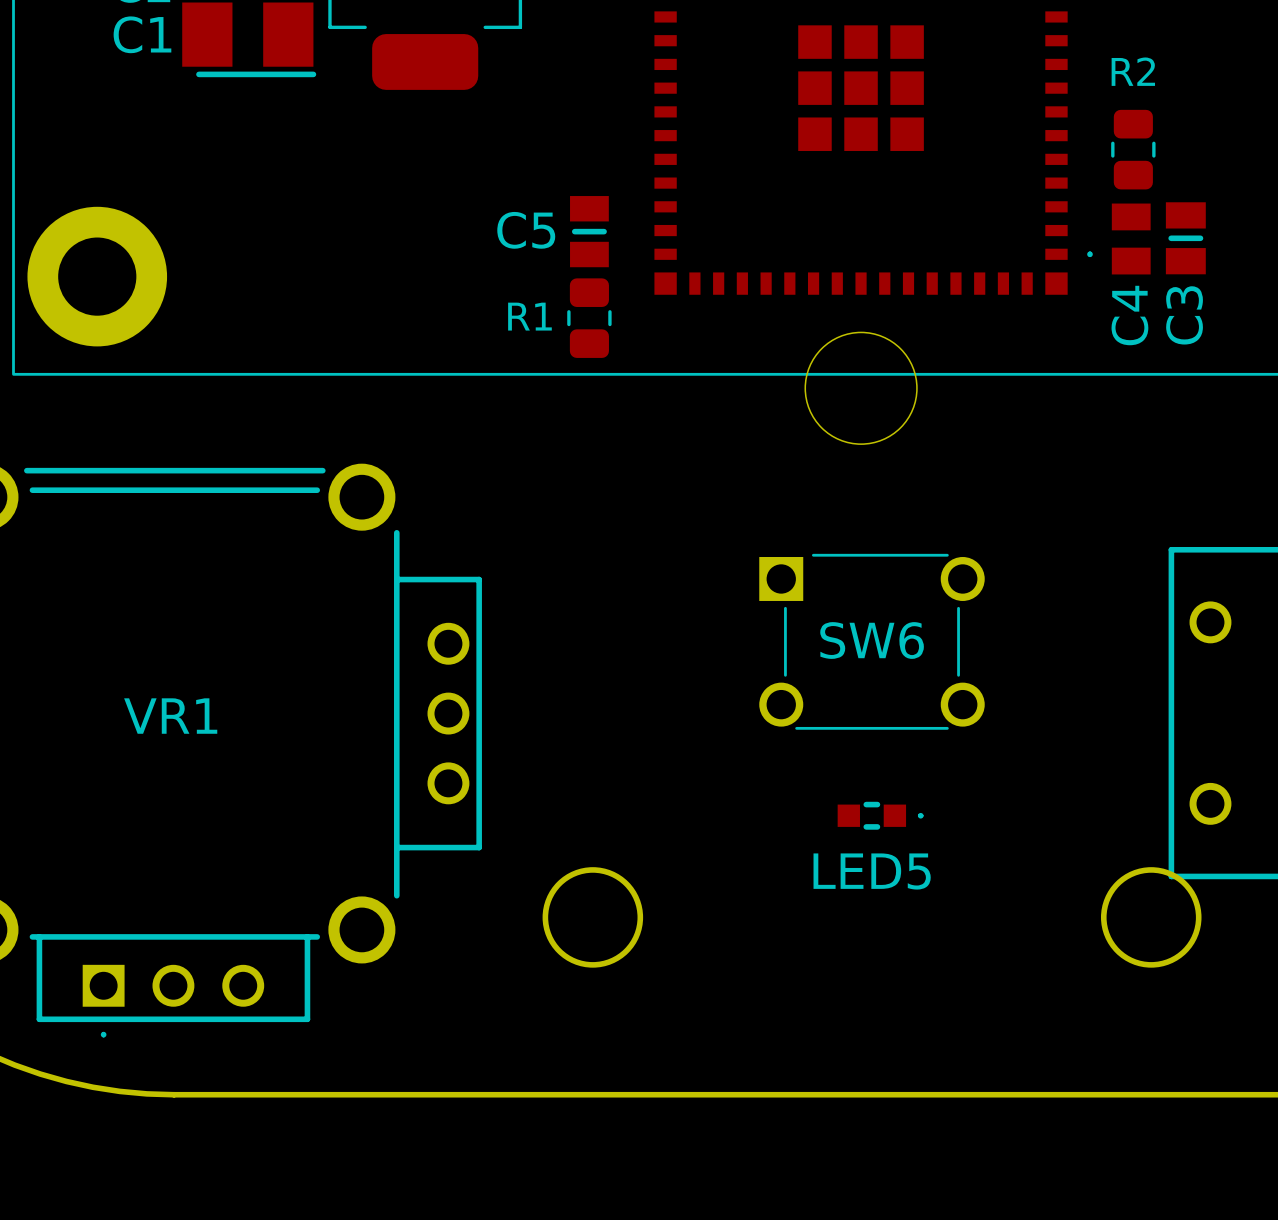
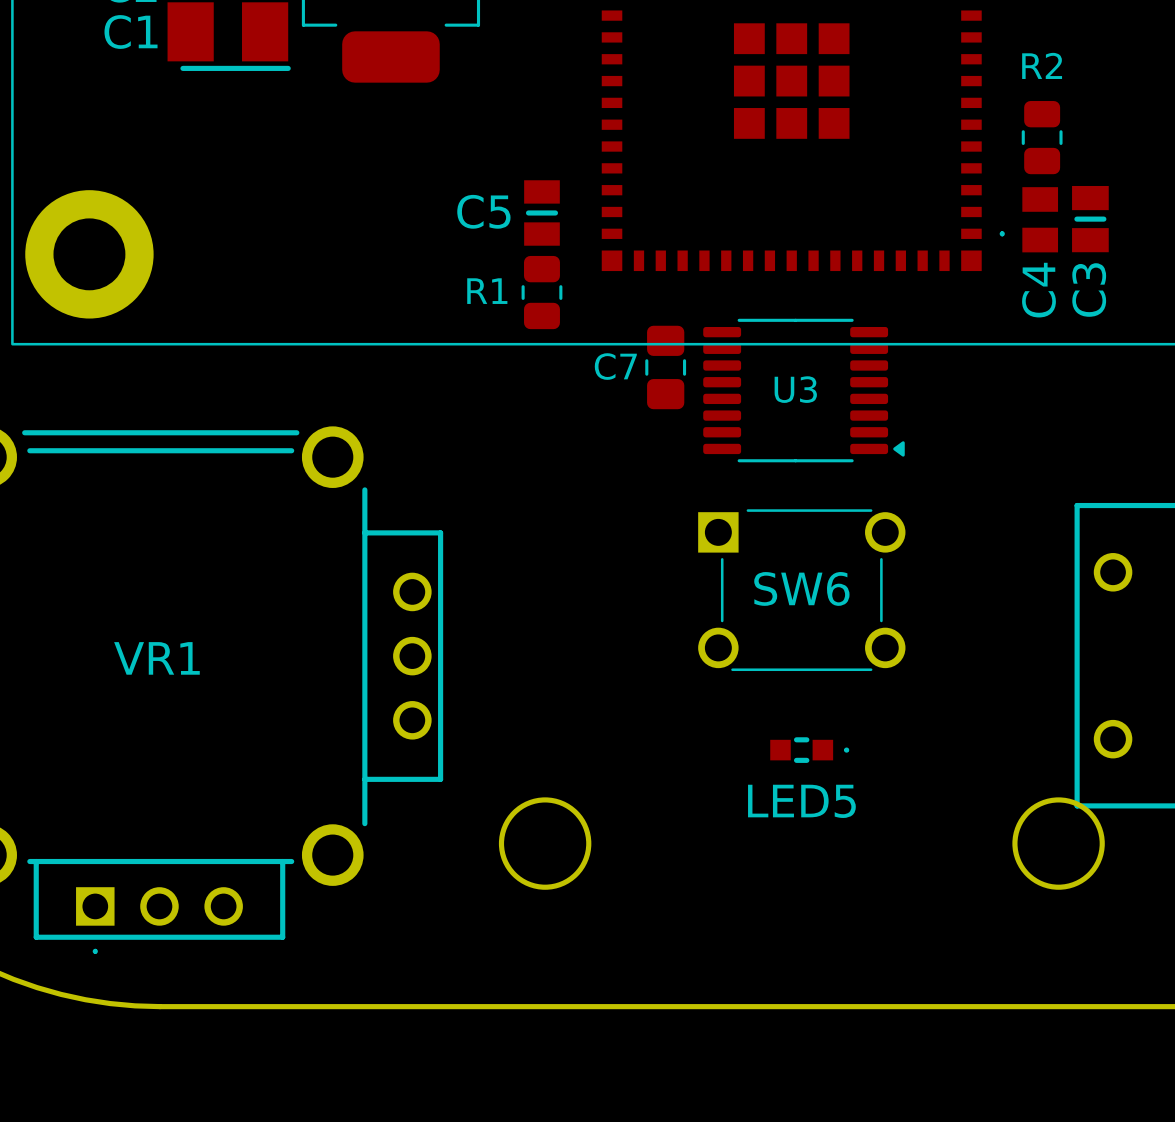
round board edge: [804, 331, 918, 445] -> none
C7: none -> (665, 367)
U3: none -> (803, 390)

